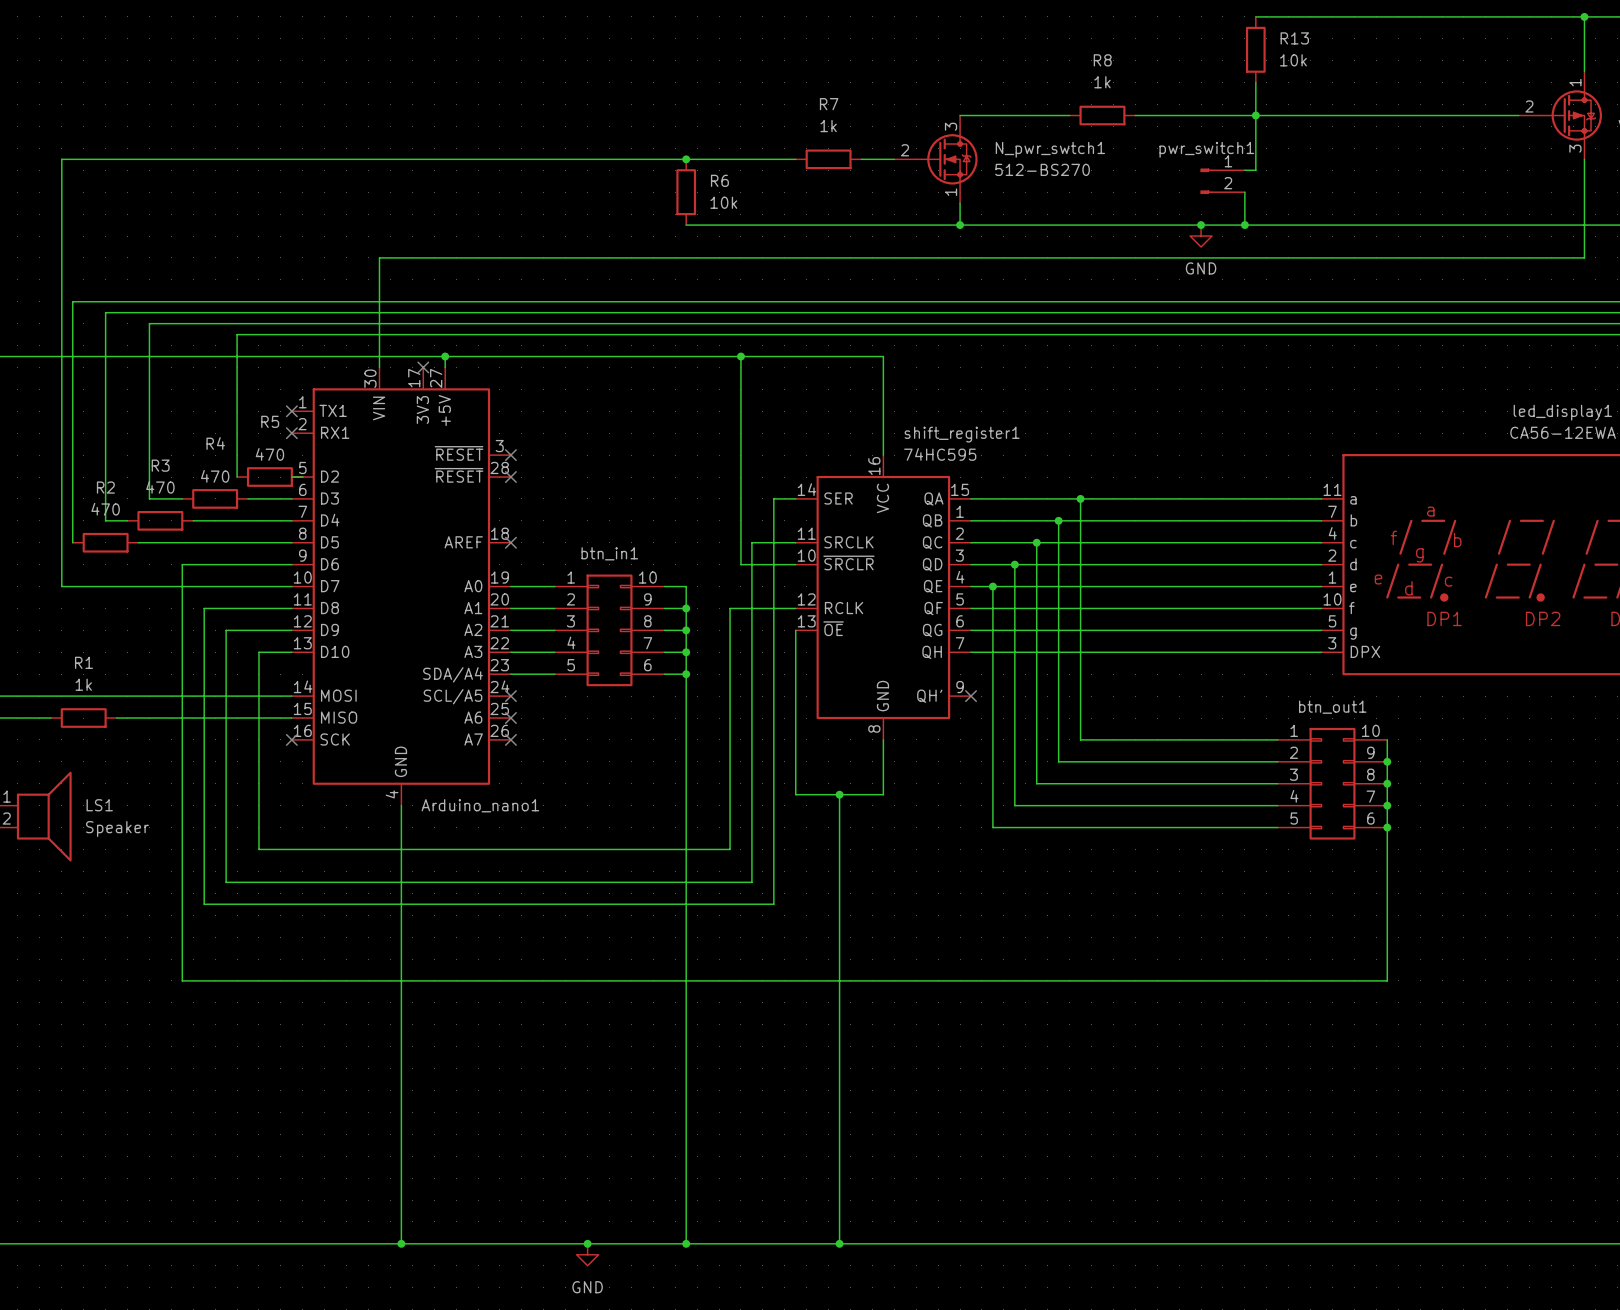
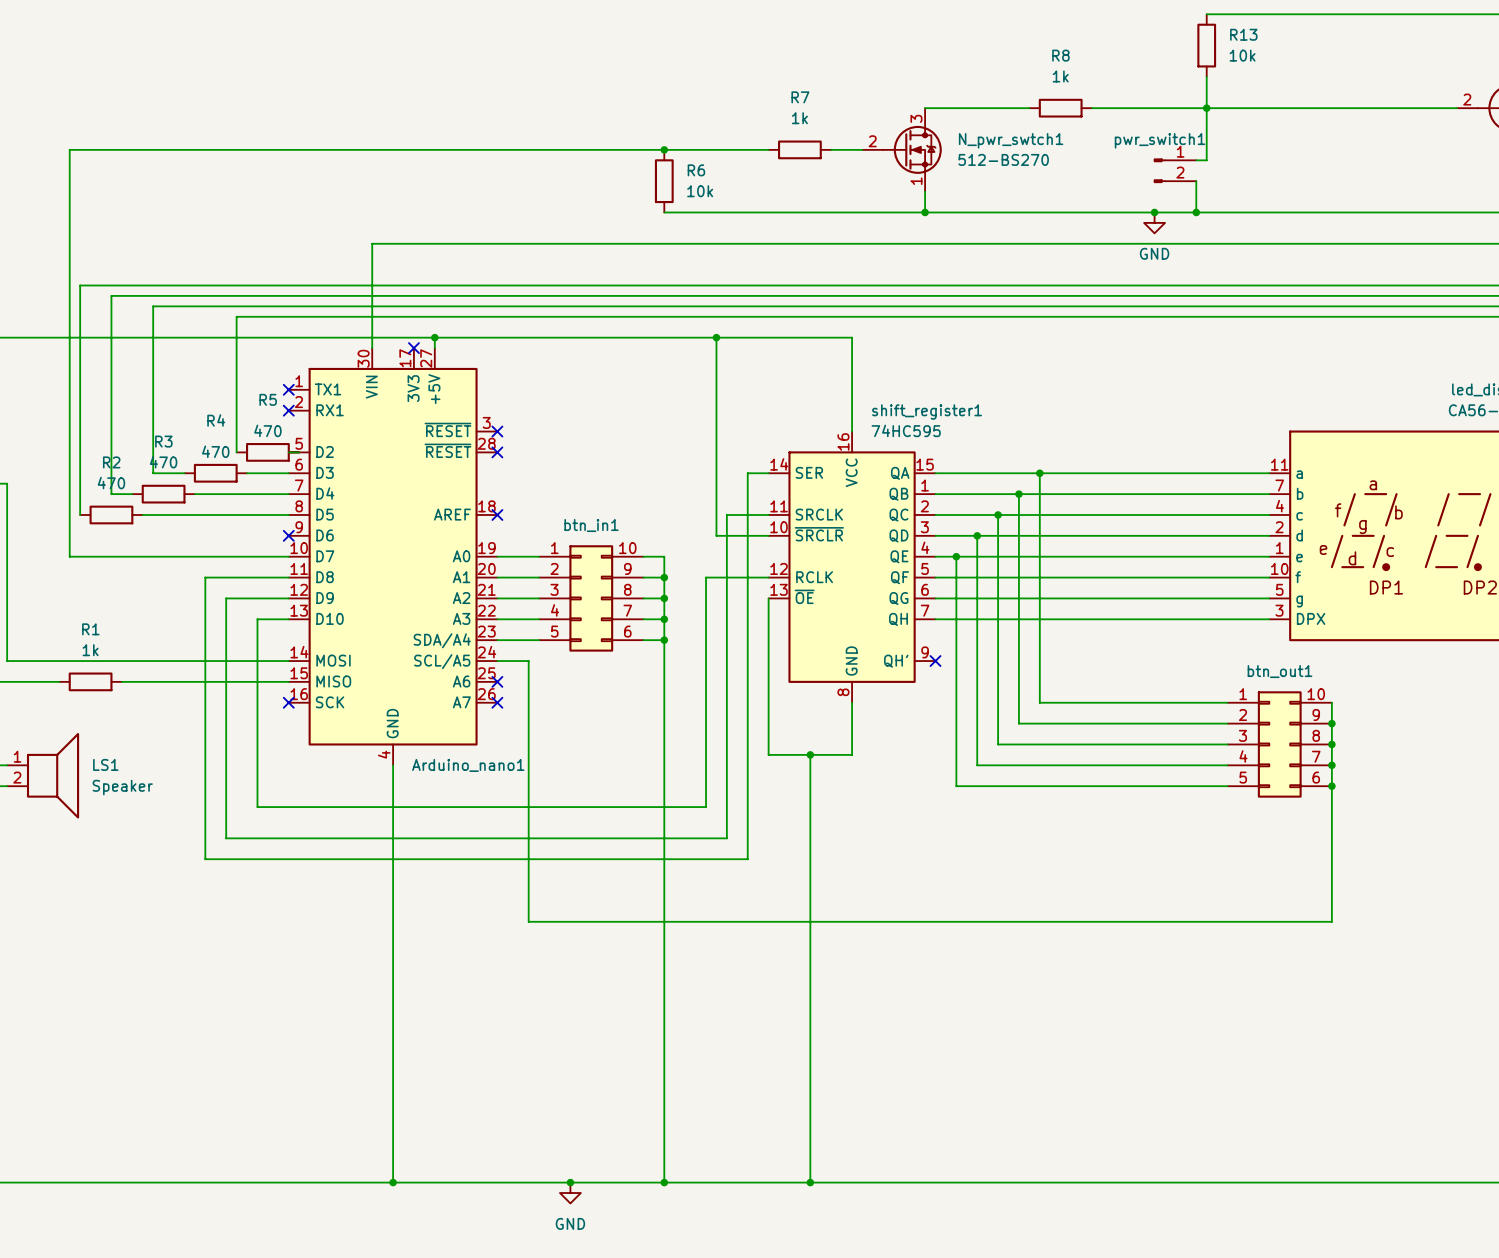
wire: (291, 564) (182, 564) (182, 980) (1387, 980) (1387, 969) -> (497, 661) (528, 661) (528, 921) (1331, 921)
no-connect mark: none -> (288, 535)
no-connect mark: (510, 696) -> none

